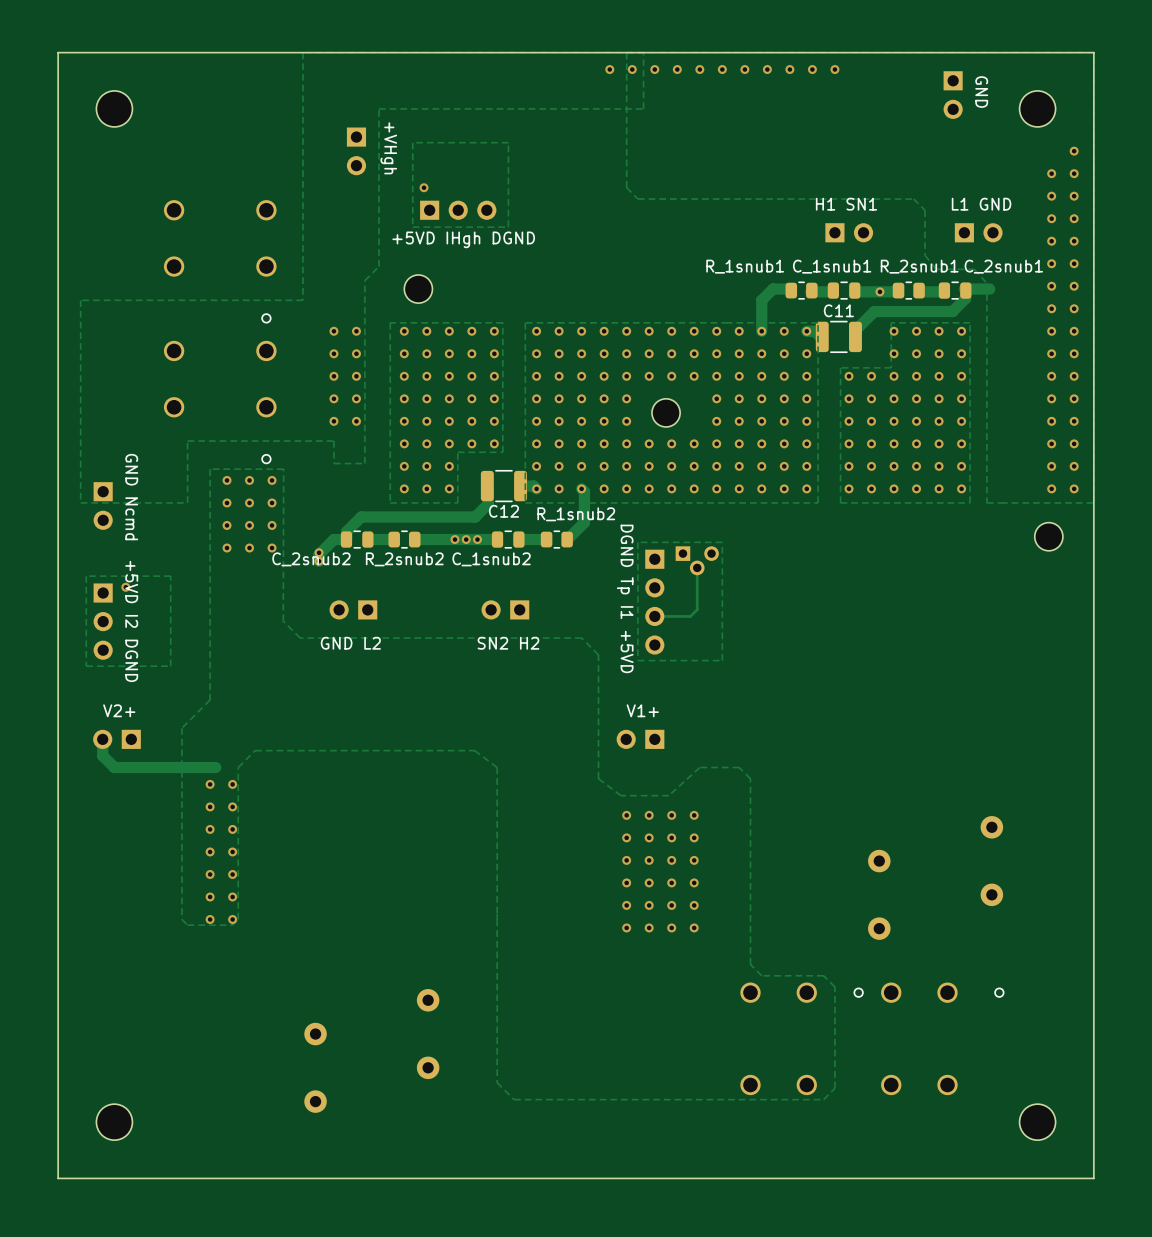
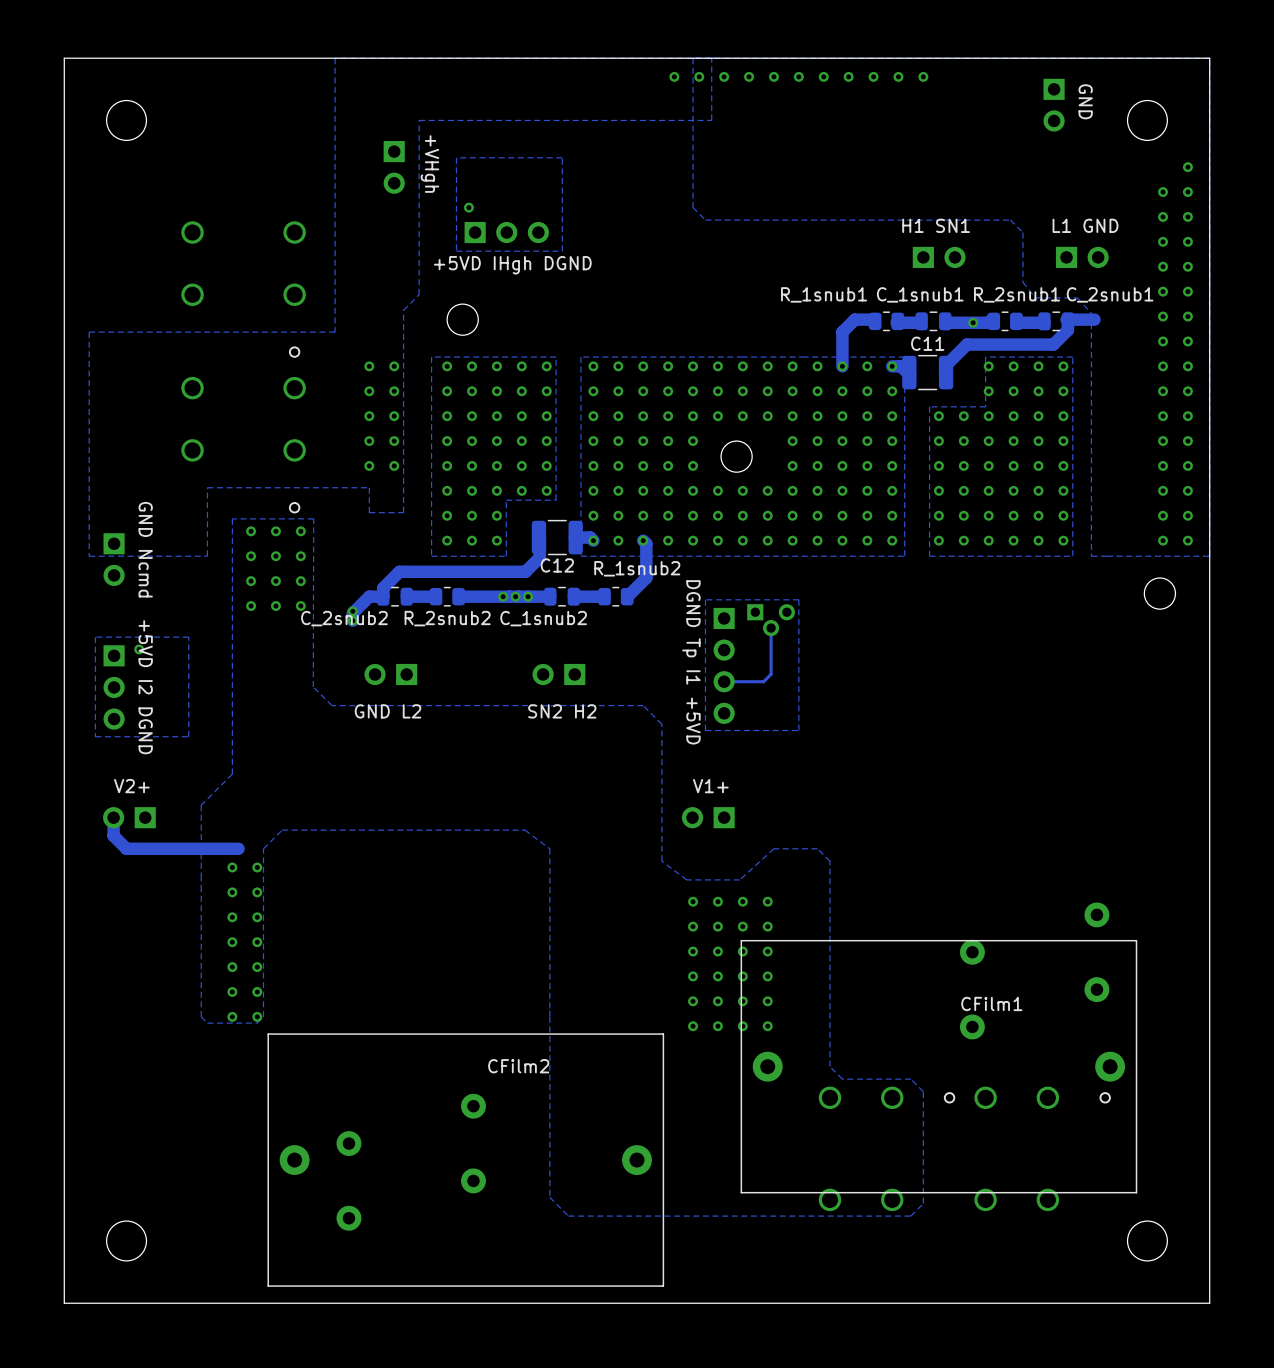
CFilm1: none -> (938, 1066)
CFilm2: none -> (465, 1160)

